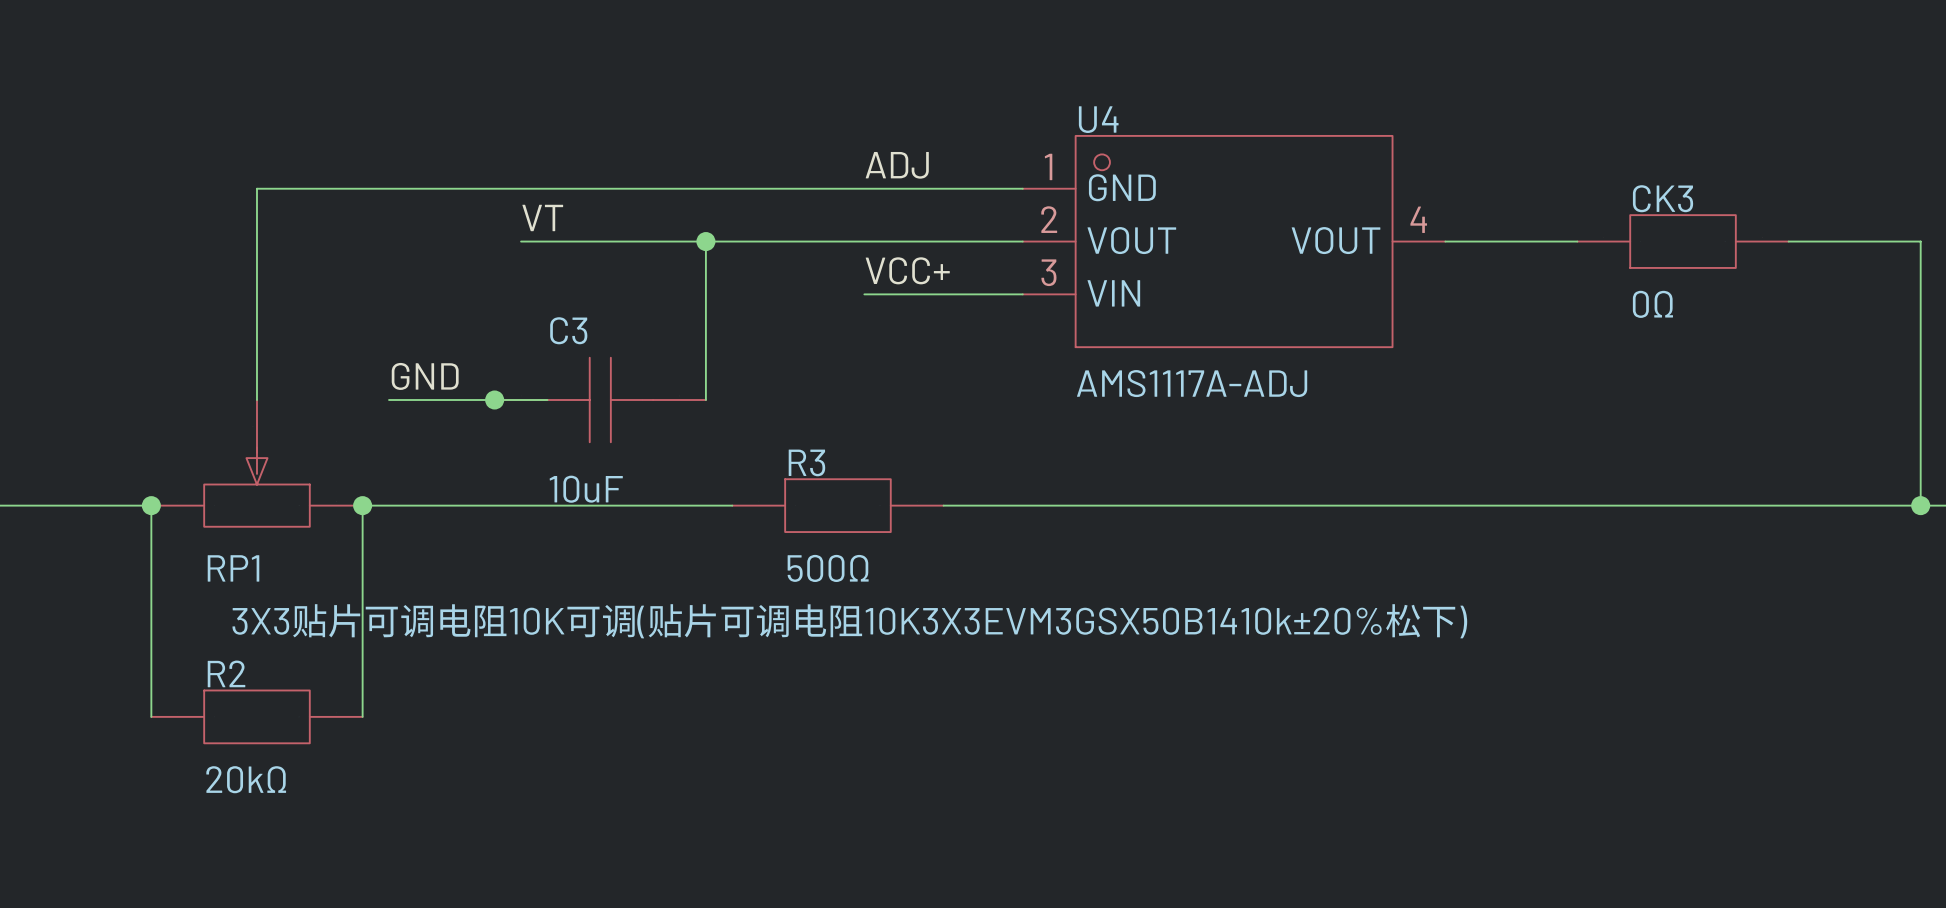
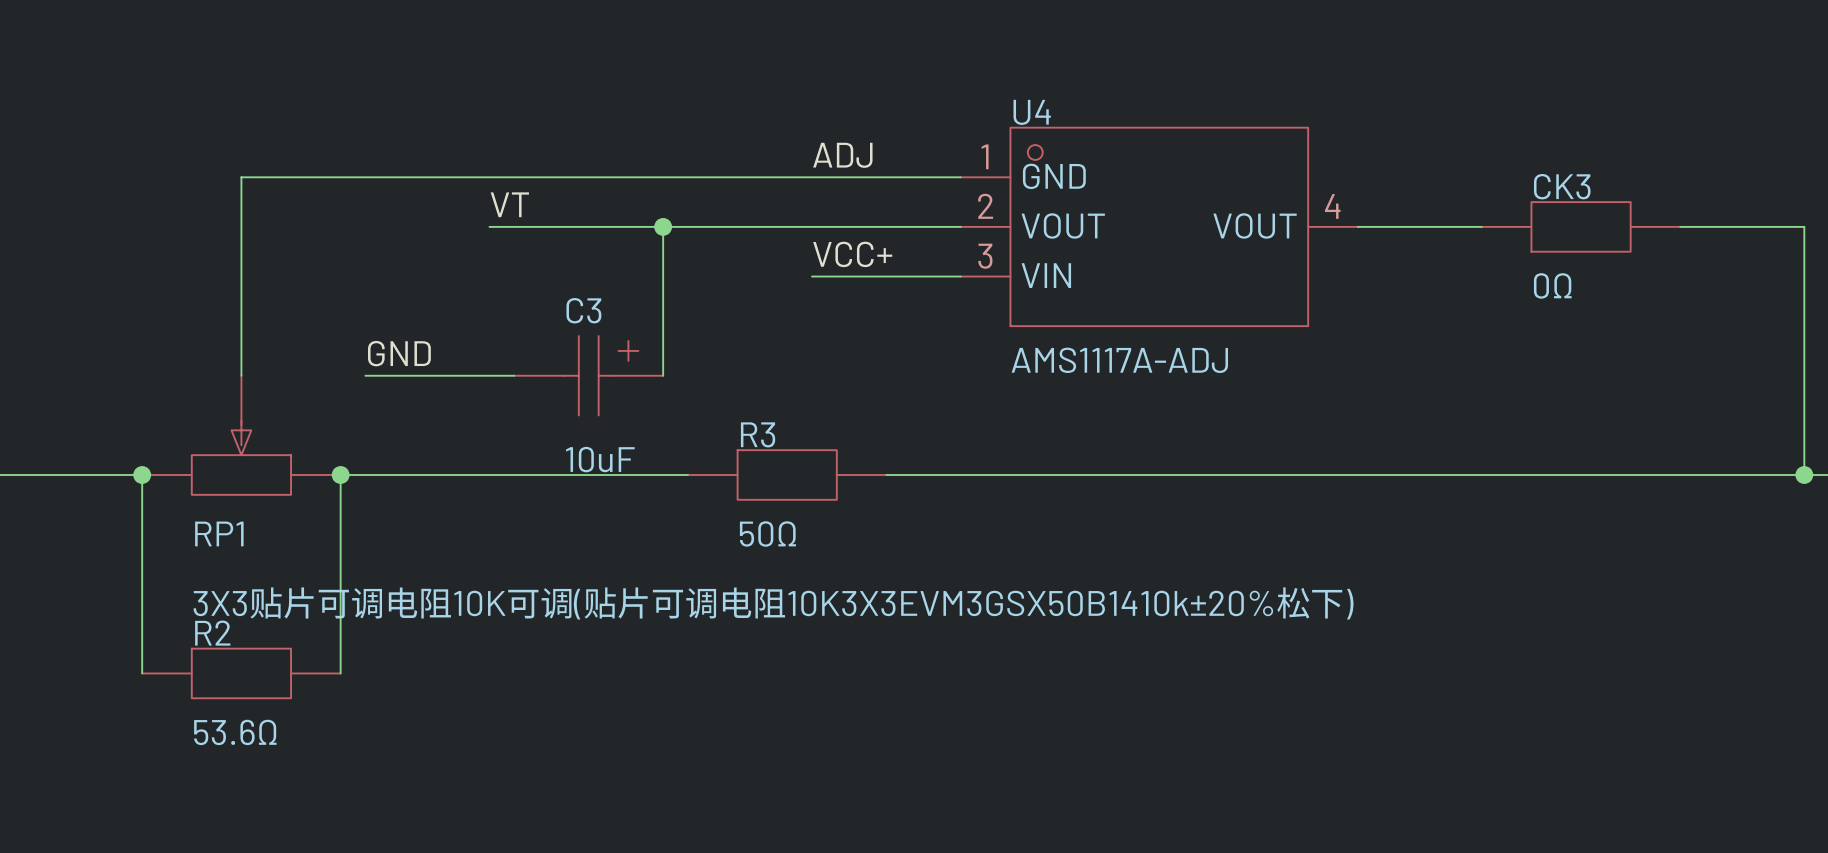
C3 symbol: [494, 357, 706, 443] -> [514, 336, 664, 416]
junction: (494, 400) -> none
R3 value: 500Ω (828, 568) -> 50Ω (767, 533)
RP1 value position: 3X3贴片可调电阻10K可调(贴片可调电阻10K3X3EVM3GSX50B1410k±20%松下) (849, 621) -> 3X3贴片可调电阻10K可调(贴片可调电阻10K3X3EVM3GSX50B1410k±20%松下) (773, 603)
R2 value: 20kΩ (246, 779) -> 53.6Ω (235, 732)

